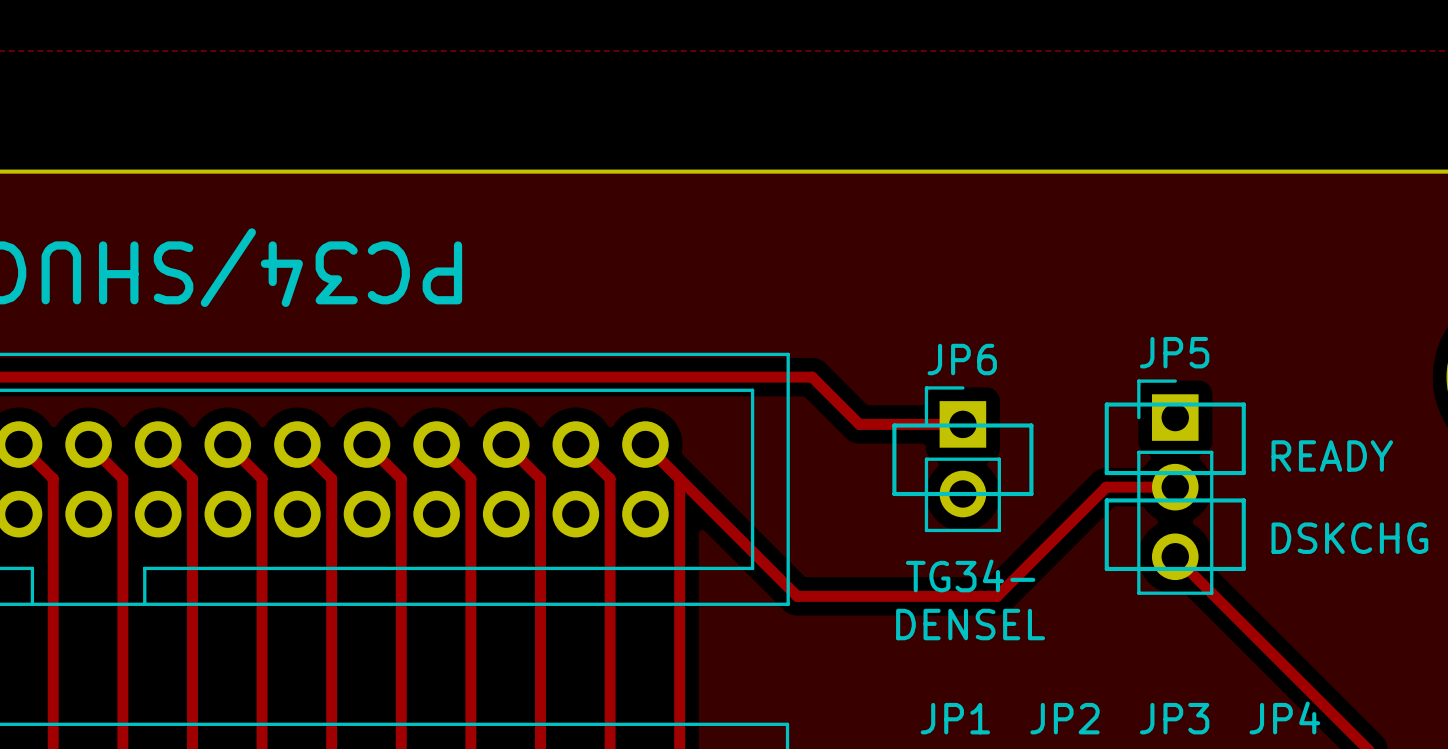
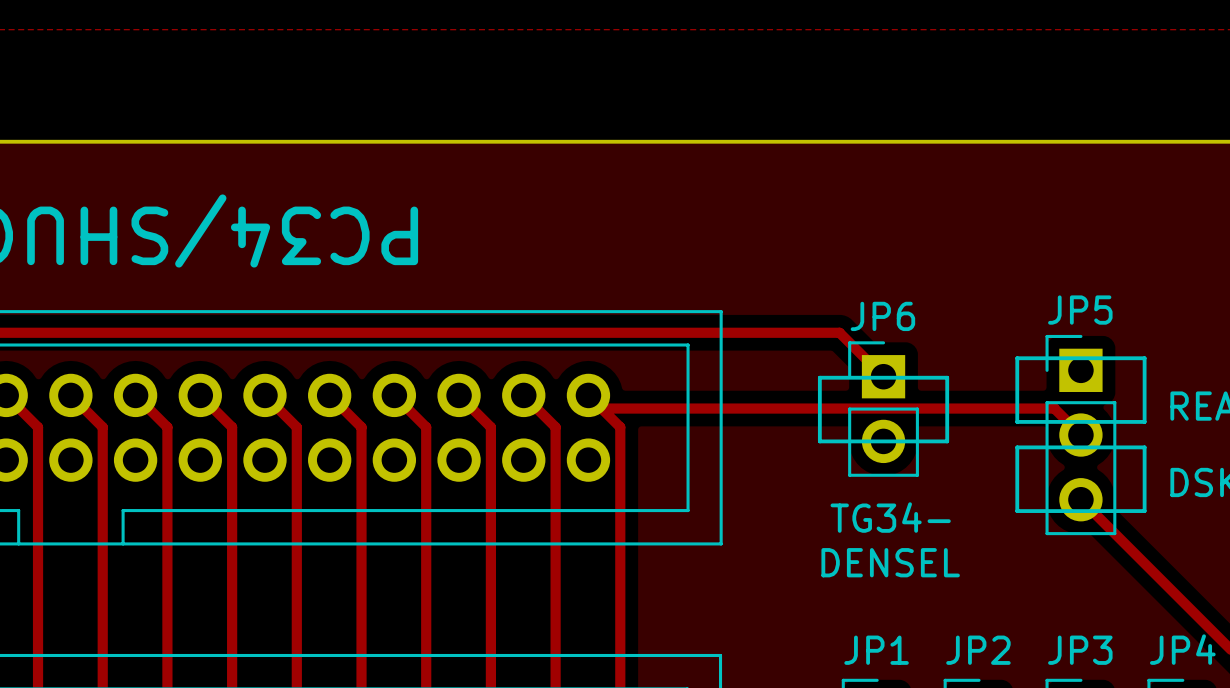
track: (812, 377) (859, 424) (962, 424) -> (743, 332) (839, 332) (883, 376)
track: (679, 478) (797, 596) (997, 596) (1106, 487) (1175, 487) -> (601, 408) (1054, 408) (1080, 435)

